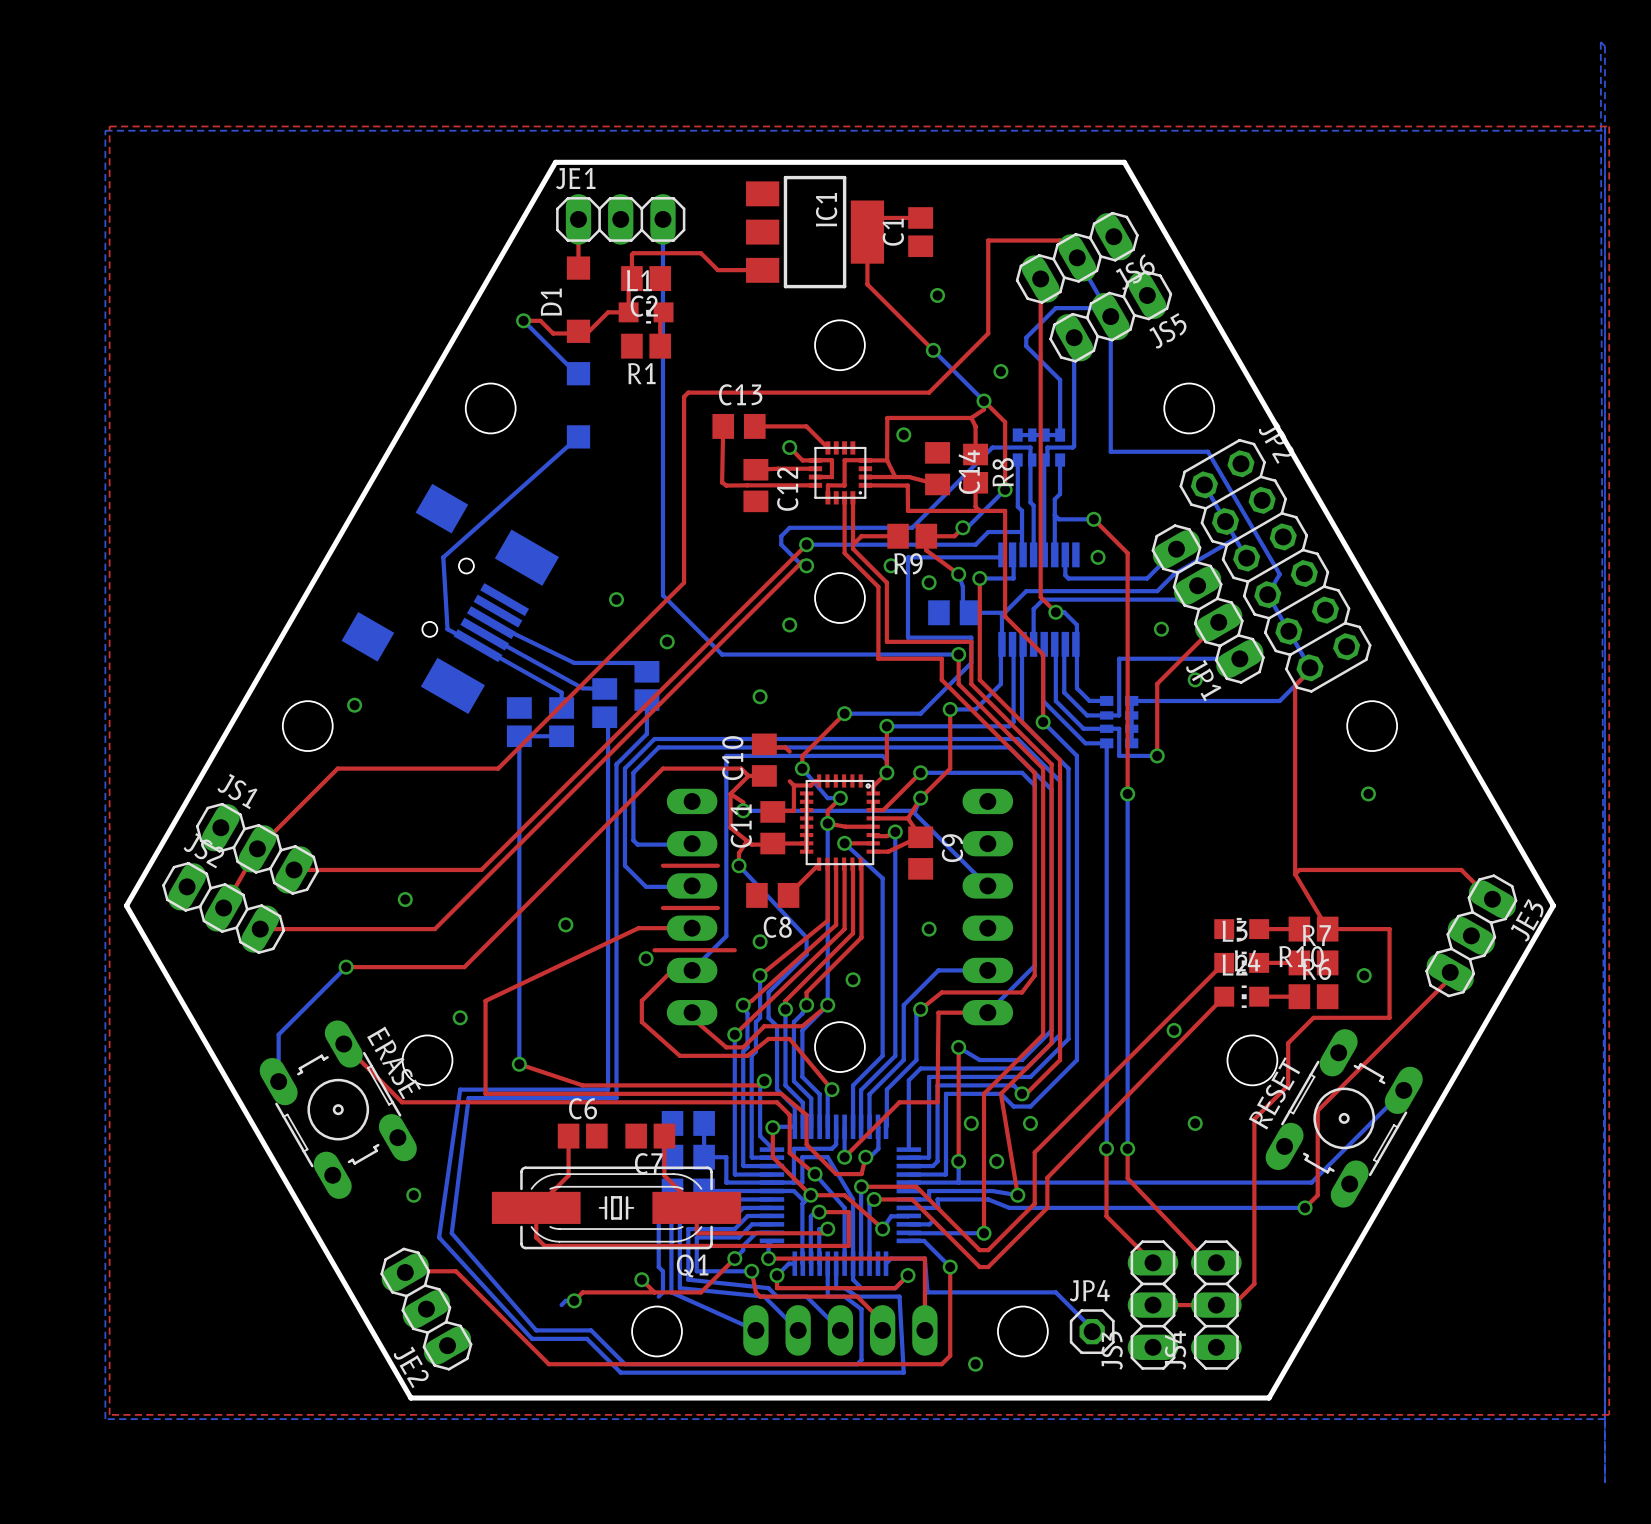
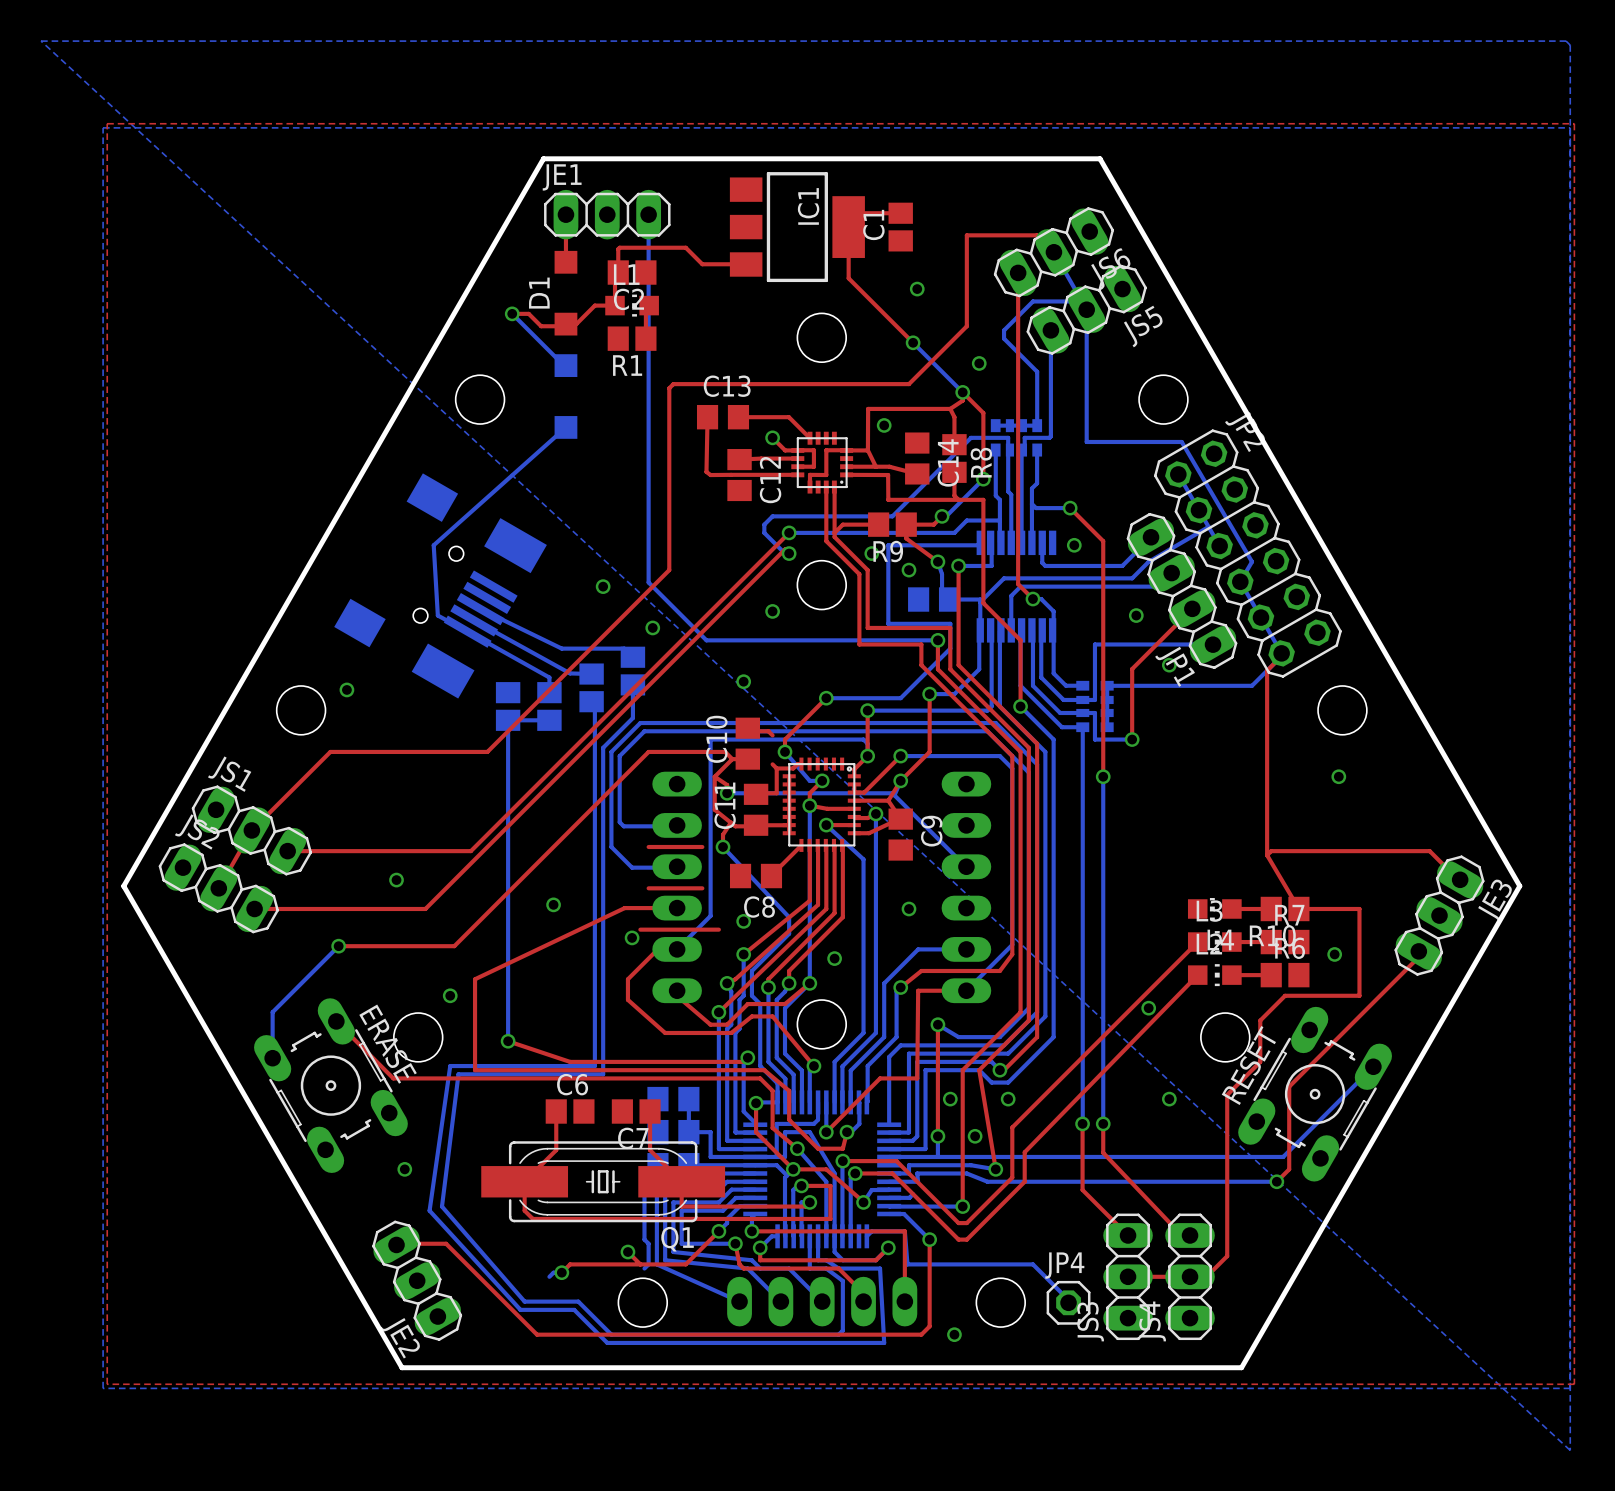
bottom zone outline: (1600, 42) (1604, 1482) -> (1566, 41) (41, 41) (1570, 1450)

